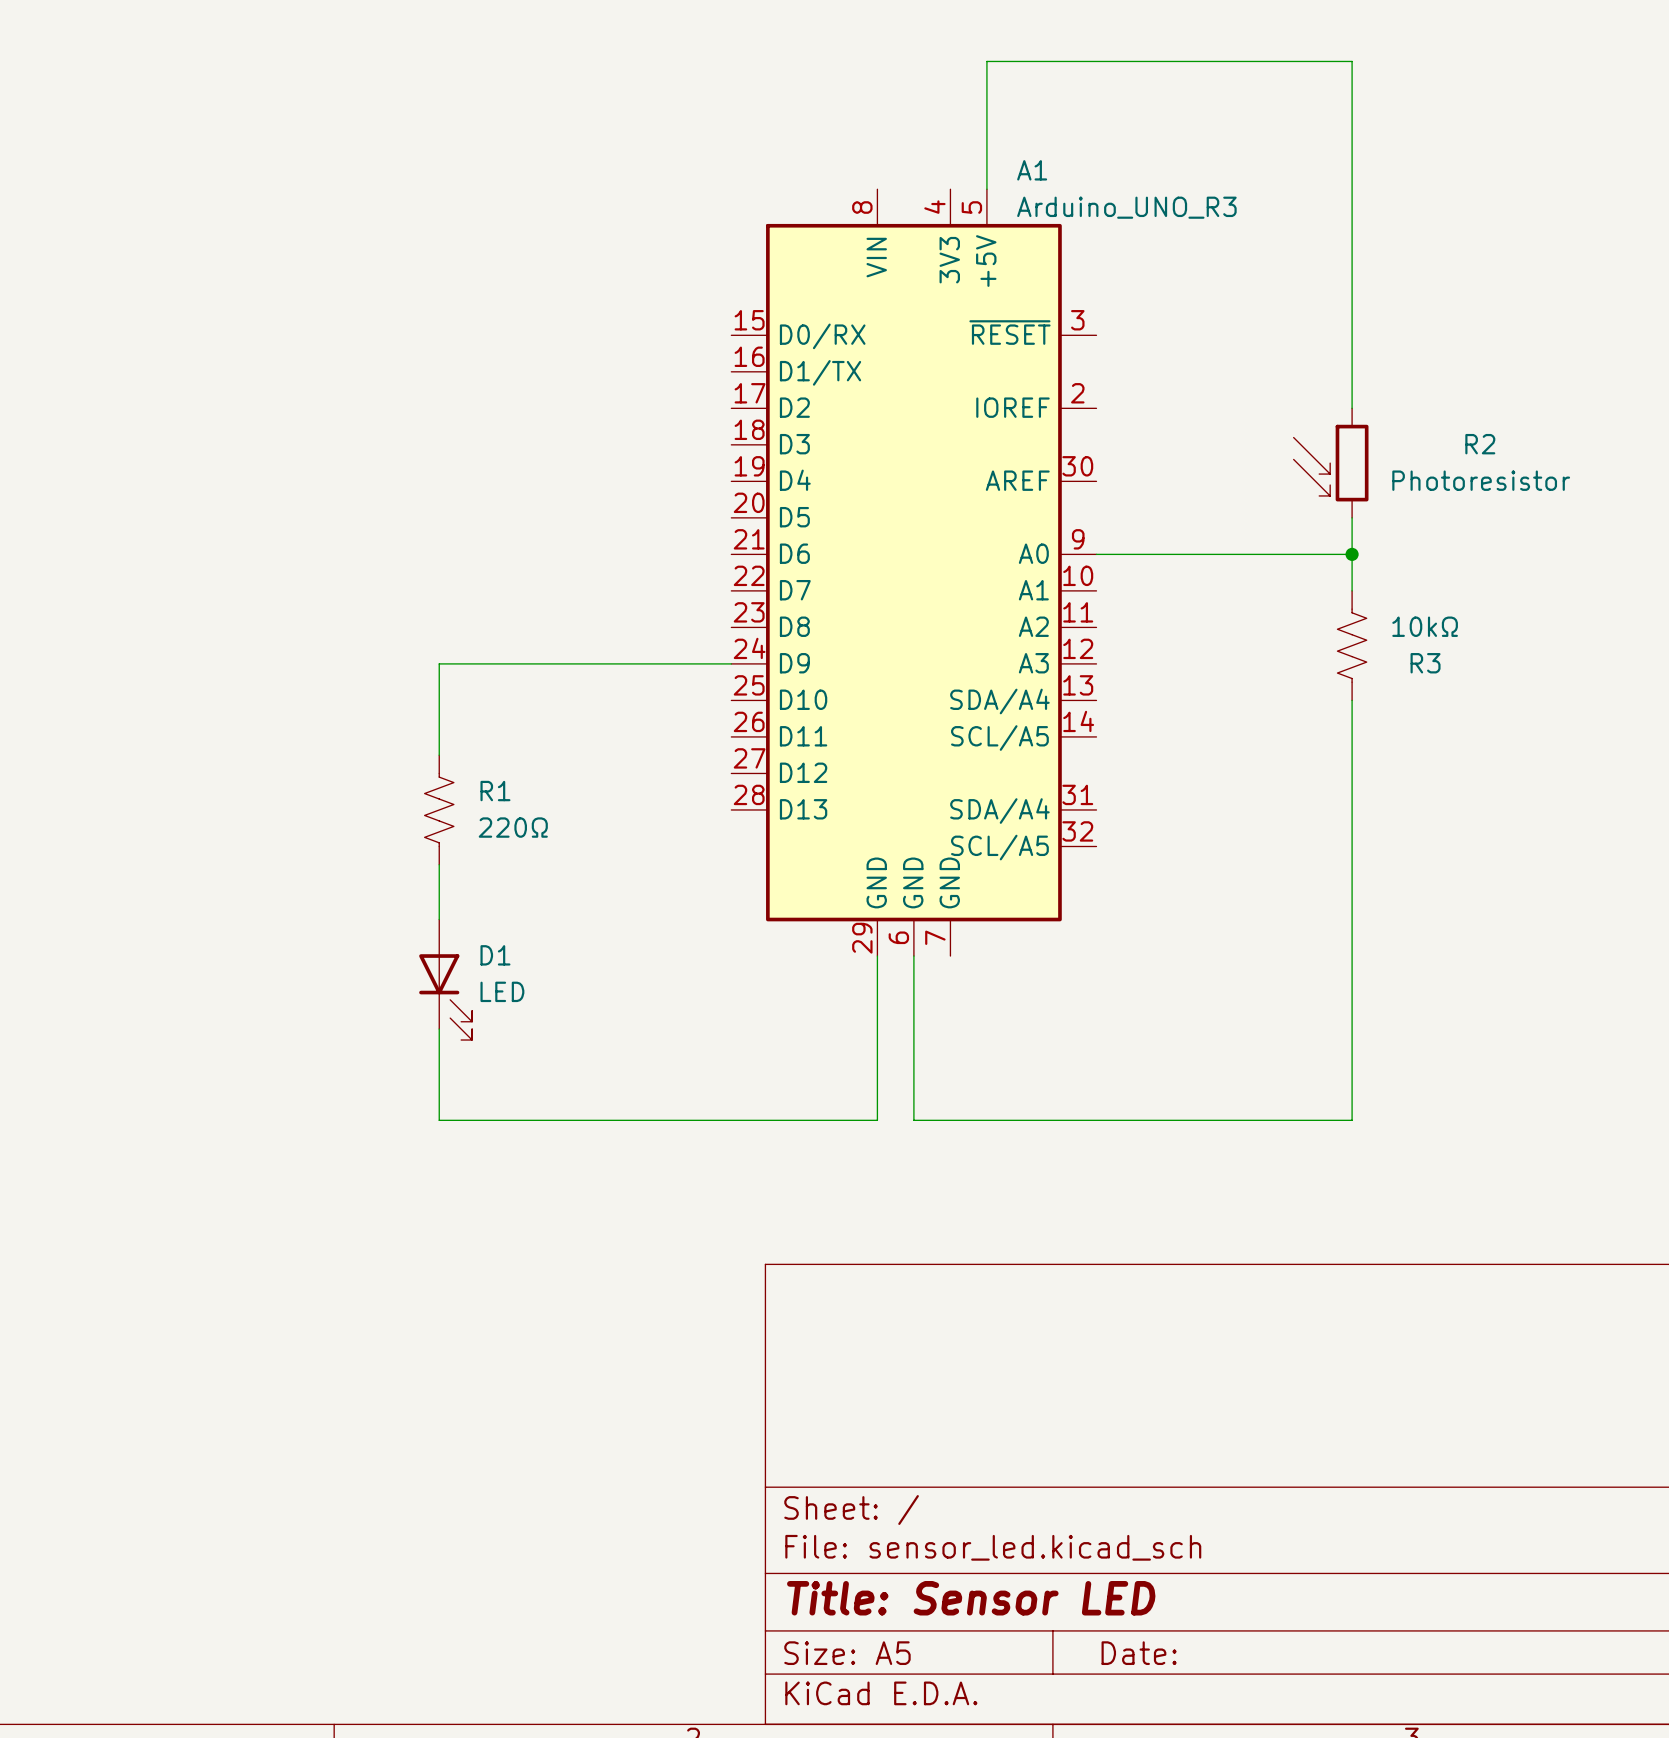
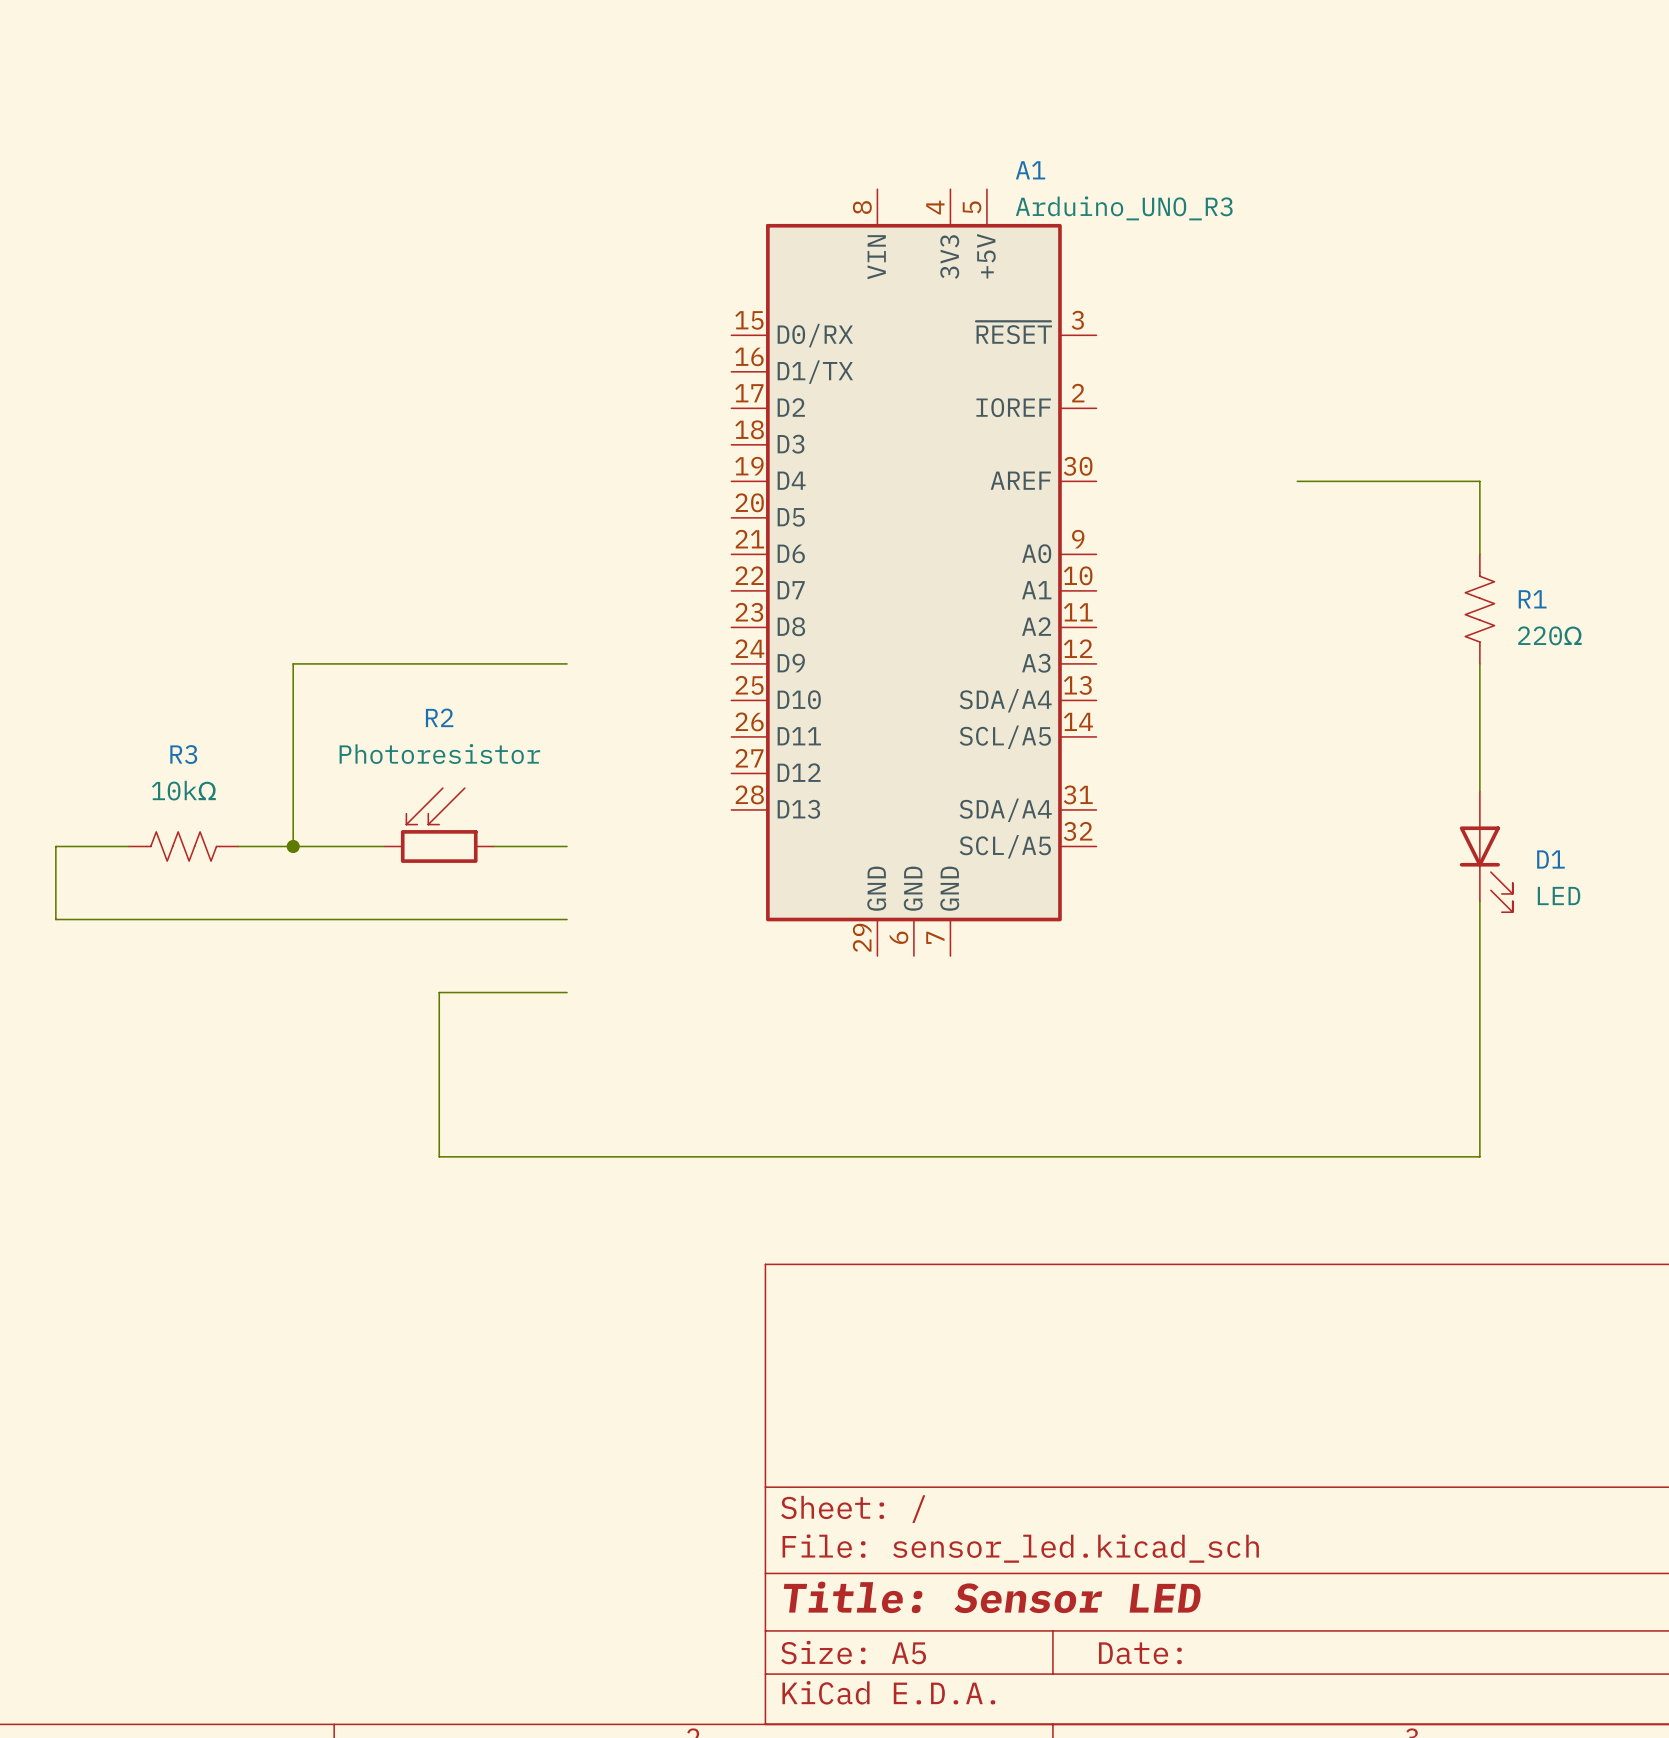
wire: (986, 189) (986, 61) (1352, 61) (1352, 408) -> none
R2 name position: R2 (1480, 444) -> R2 (439, 717)
R2 rotation: 0° (1331, 463) -> 90° clockwise (439, 825)
R2 position: (1331, 463) -> (439, 825)
R2 value position: Photoresistor (1481, 480) -> Photoresistor (439, 754)
wire: none -> (1297, 481) (1479, 481) (1479, 554)
wire: (1352, 517) (1352, 590) -> none
wire: (1096, 554) (1352, 554) -> none
junction: (1352, 554) -> none
R3 value position: 10kΩ (1425, 626) -> 10kΩ (183, 790)
R3 rotation: 0° (1352, 645) -> 90° clockwise (183, 846)
R3 position: (1352, 645) -> (183, 846)
wire: (439, 663) (439, 755) -> (439, 663) (293, 663) (293, 846)
wire: (567, 663) (731, 663) -> none
R3 name position: R3 (1425, 663) -> R3 (183, 754)
wire: none -> (1479, 663) (1479, 791)
wire: (1352, 700) (1352, 1120) (913, 1120) (913, 956) -> none
R1 name position: R1 (495, 791) -> R1 (1532, 599)
R1 position: (439, 809) -> (1479, 609)
R1 value position: 220Ω (513, 827) -> 220Ω (1549, 635)
wire: none -> (128, 846) (55, 846) (55, 919) (567, 919)
wire: none -> (238, 846) (384, 846)
junction: none -> (293, 846)
wire: none -> (494, 846) (567, 846)
wire: (439, 864) (439, 919) -> none
D1 name position: D1 (495, 955) -> D1 (1550, 859)
wire: (877, 956) (877, 1120) (439, 1120) -> (1479, 901) (1479, 1156) (439, 1156) (439, 1120)
D1 position: (445, 979) -> (1486, 851)
D1 value position: LED (502, 991) -> LED (1559, 896)
wire: none -> (567, 992) (439, 992) (439, 1029)

